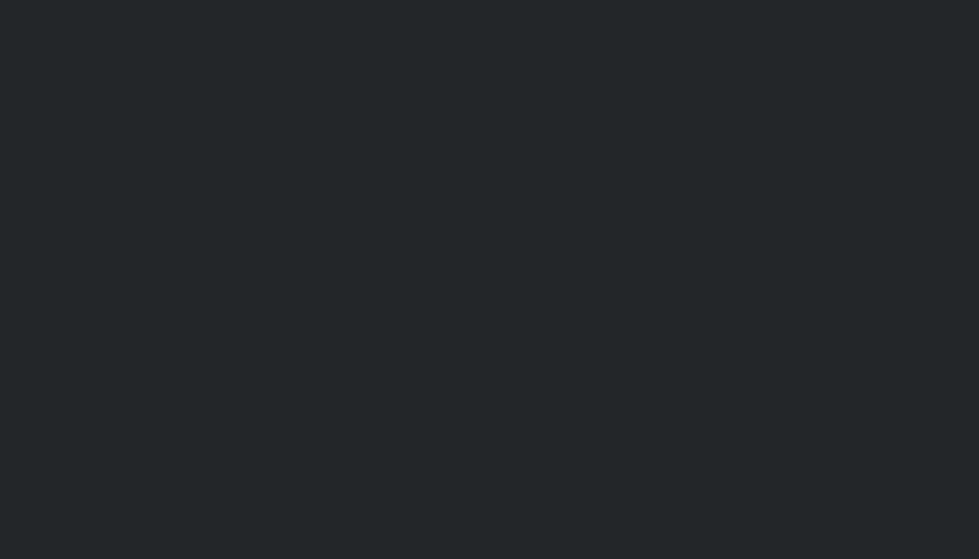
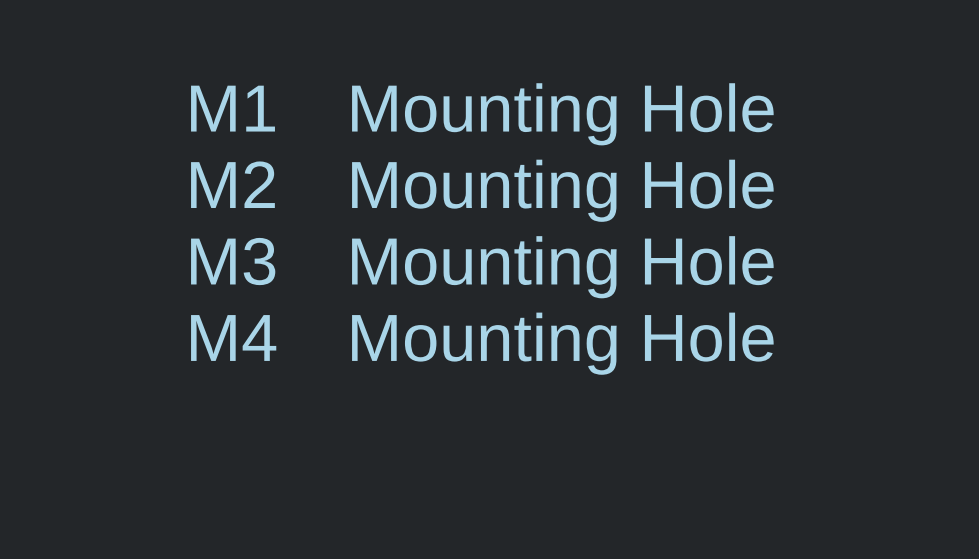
M1: none -> Mounting Hole (482, 114)
M2: none -> Mounting Hole (482, 190)
M3: none -> Mounting Hole (482, 267)
M4: none -> Mounting Hole (482, 343)

